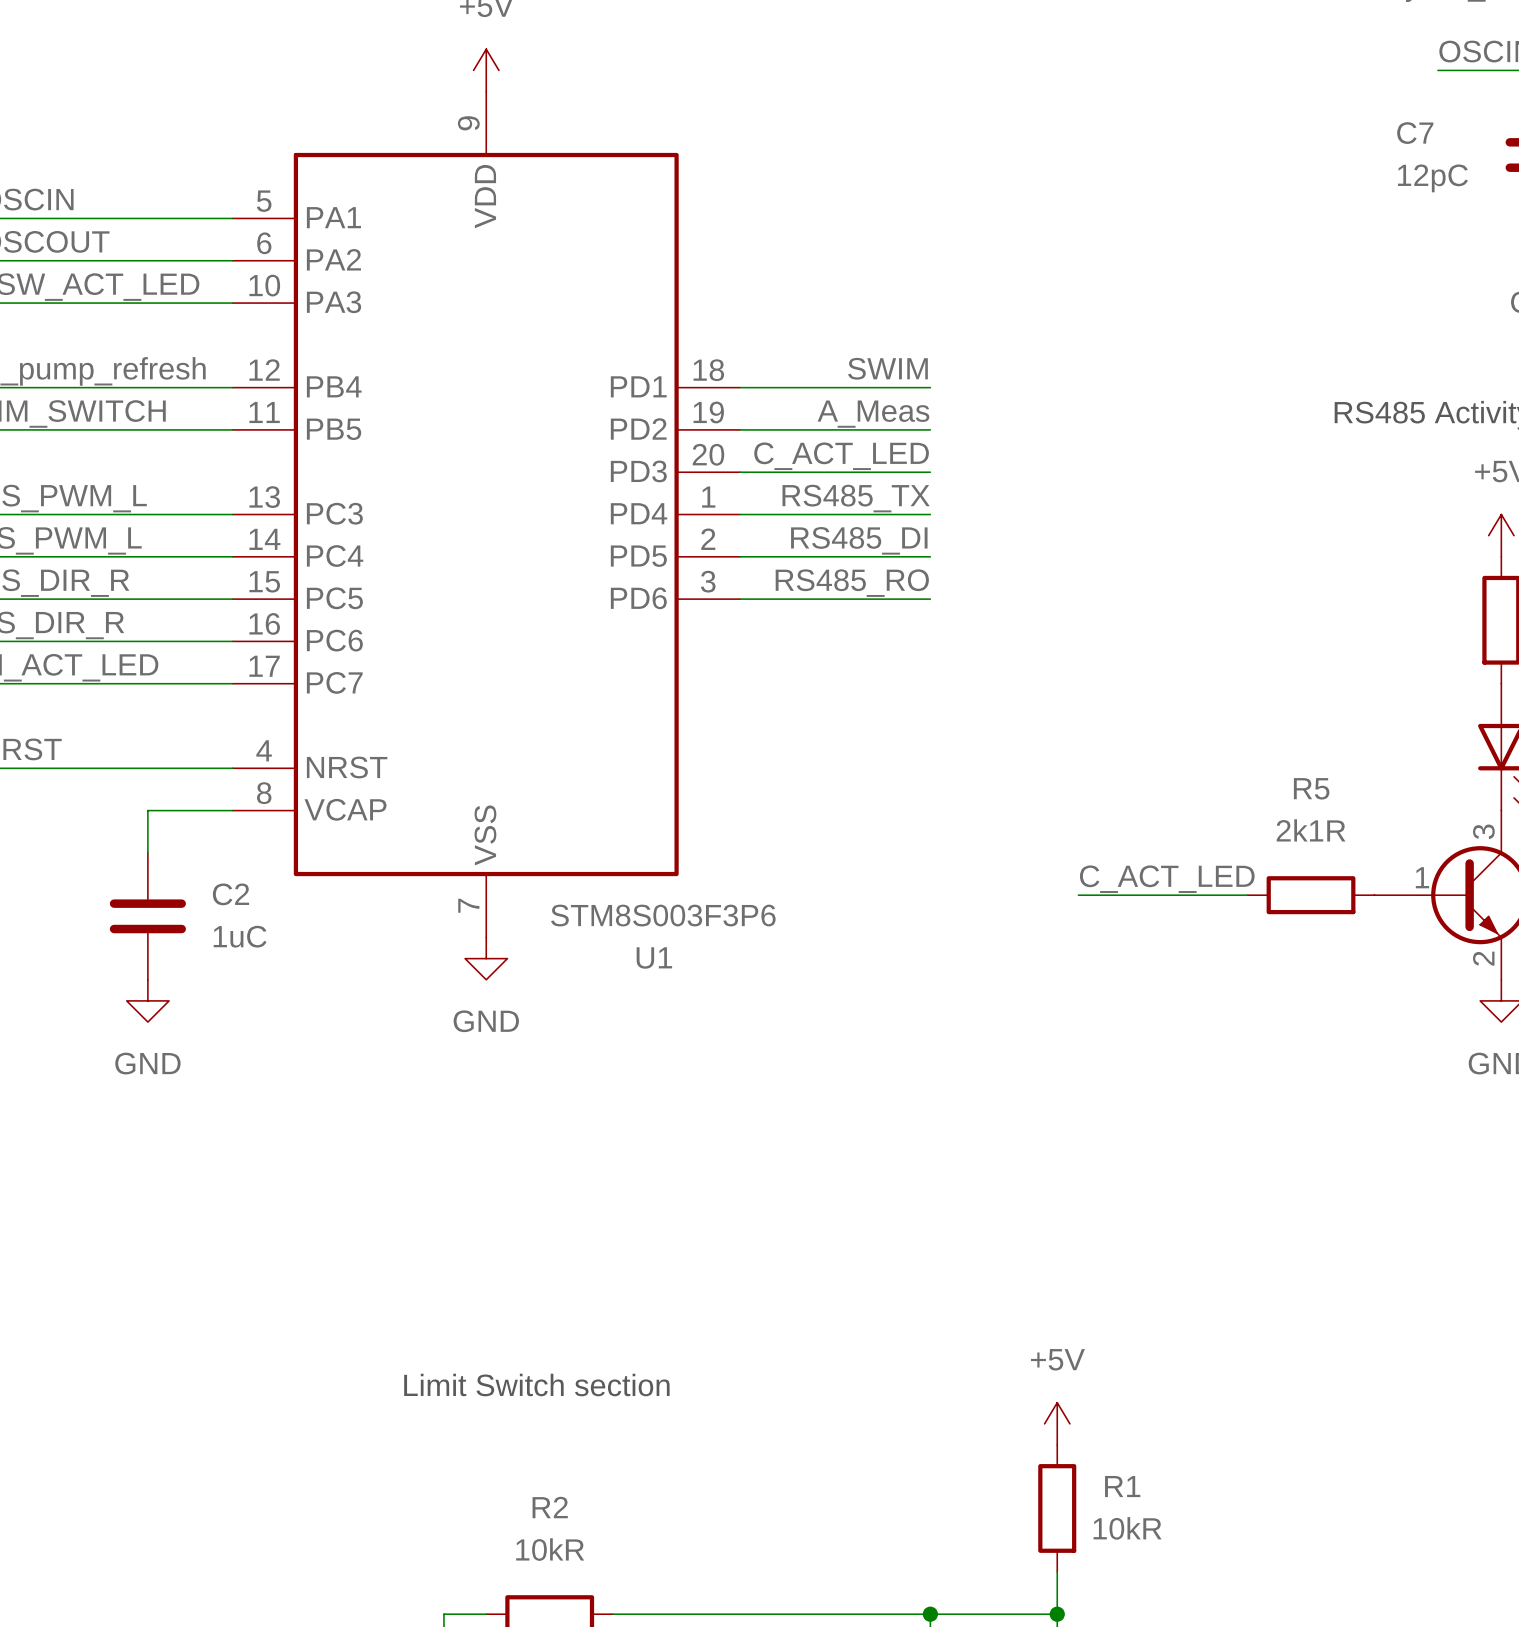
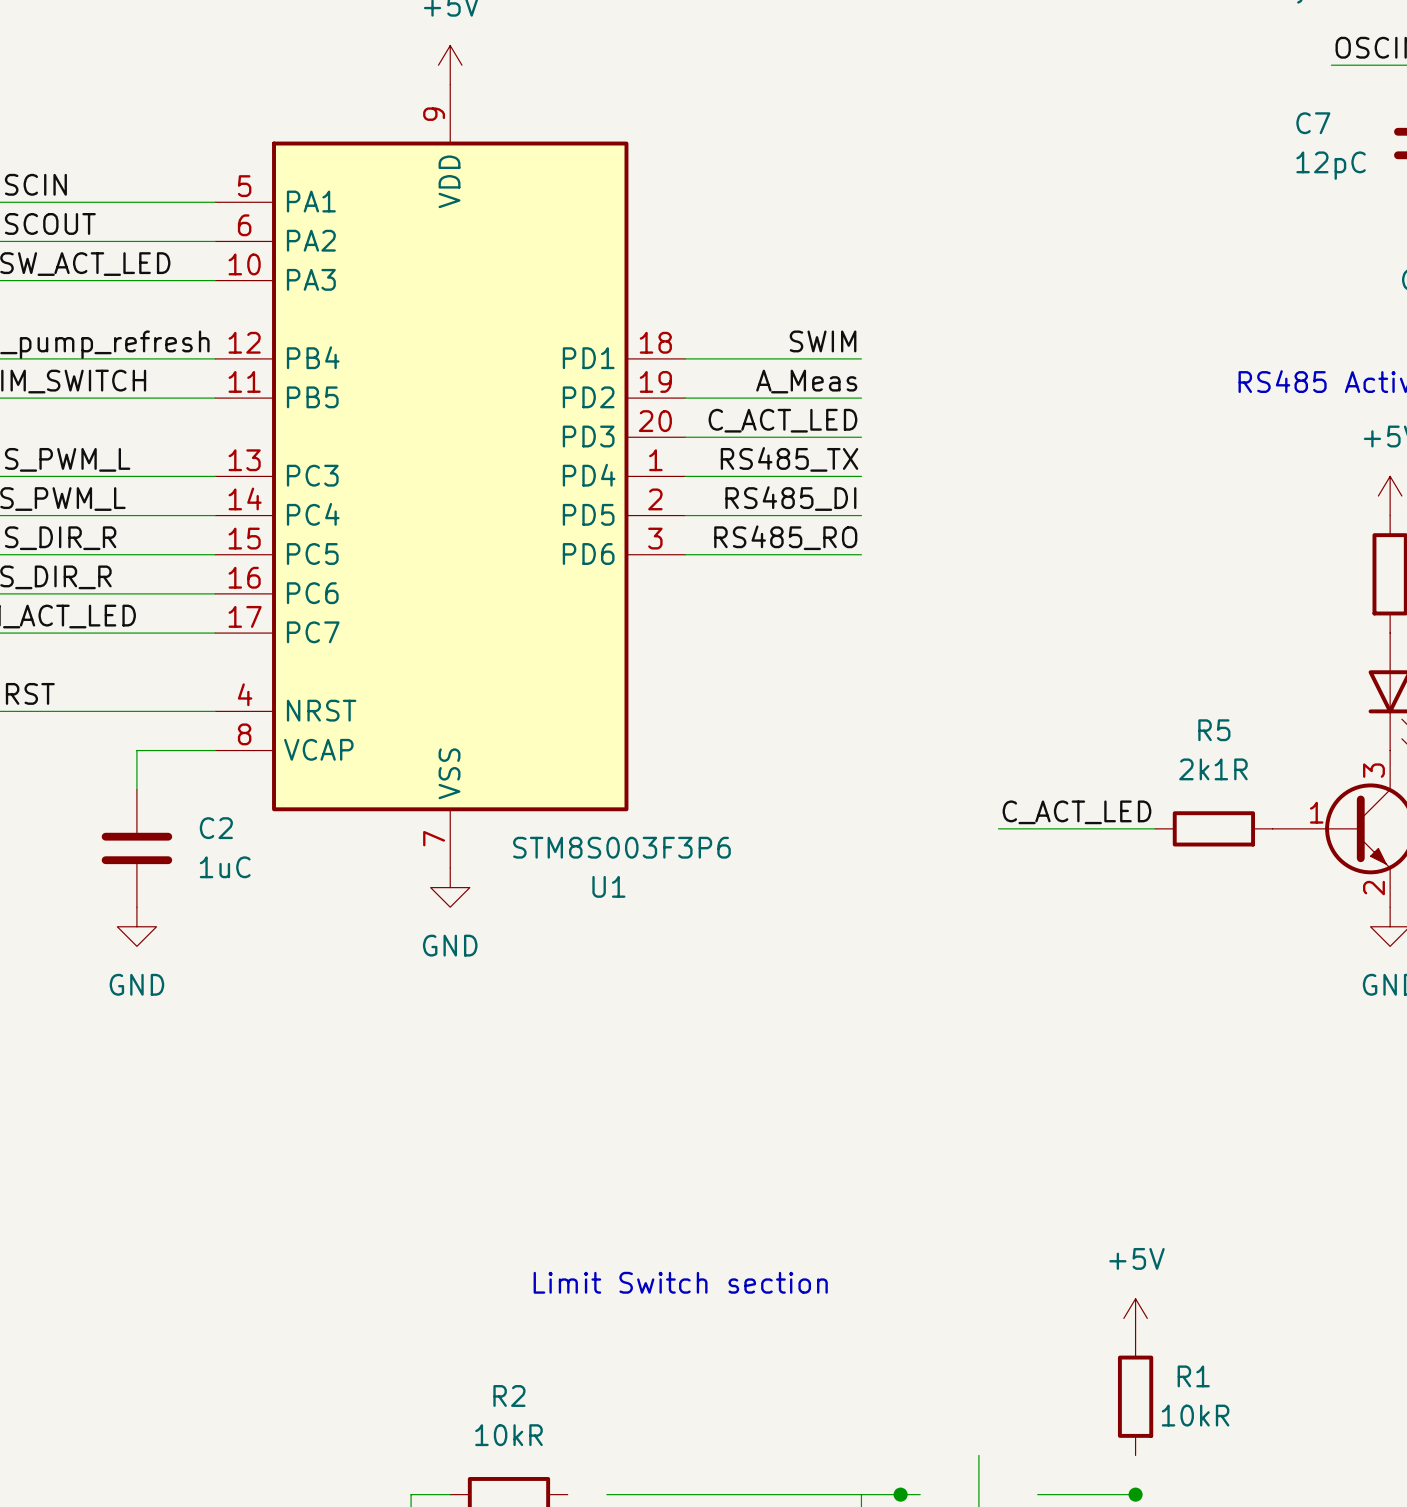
text position: Limit Switch section (536, 1384) -> Limit Switch section (680, 1282)
power symbol position: +5V (1057, 1423) -> +5V (1135, 1318)
R1 position: (1057, 1508) -> (1135, 1396)
wire: (613, 1614) (655, 1614) -> none
junction: (930, 1614) -> none
junction: none -> (900, 1494)
wire: (993, 1614) (1057, 1614) -> none
junction: (1057, 1614) -> none
wire: none -> (1037, 1494) (1135, 1494)
junction: none -> (1135, 1494)

